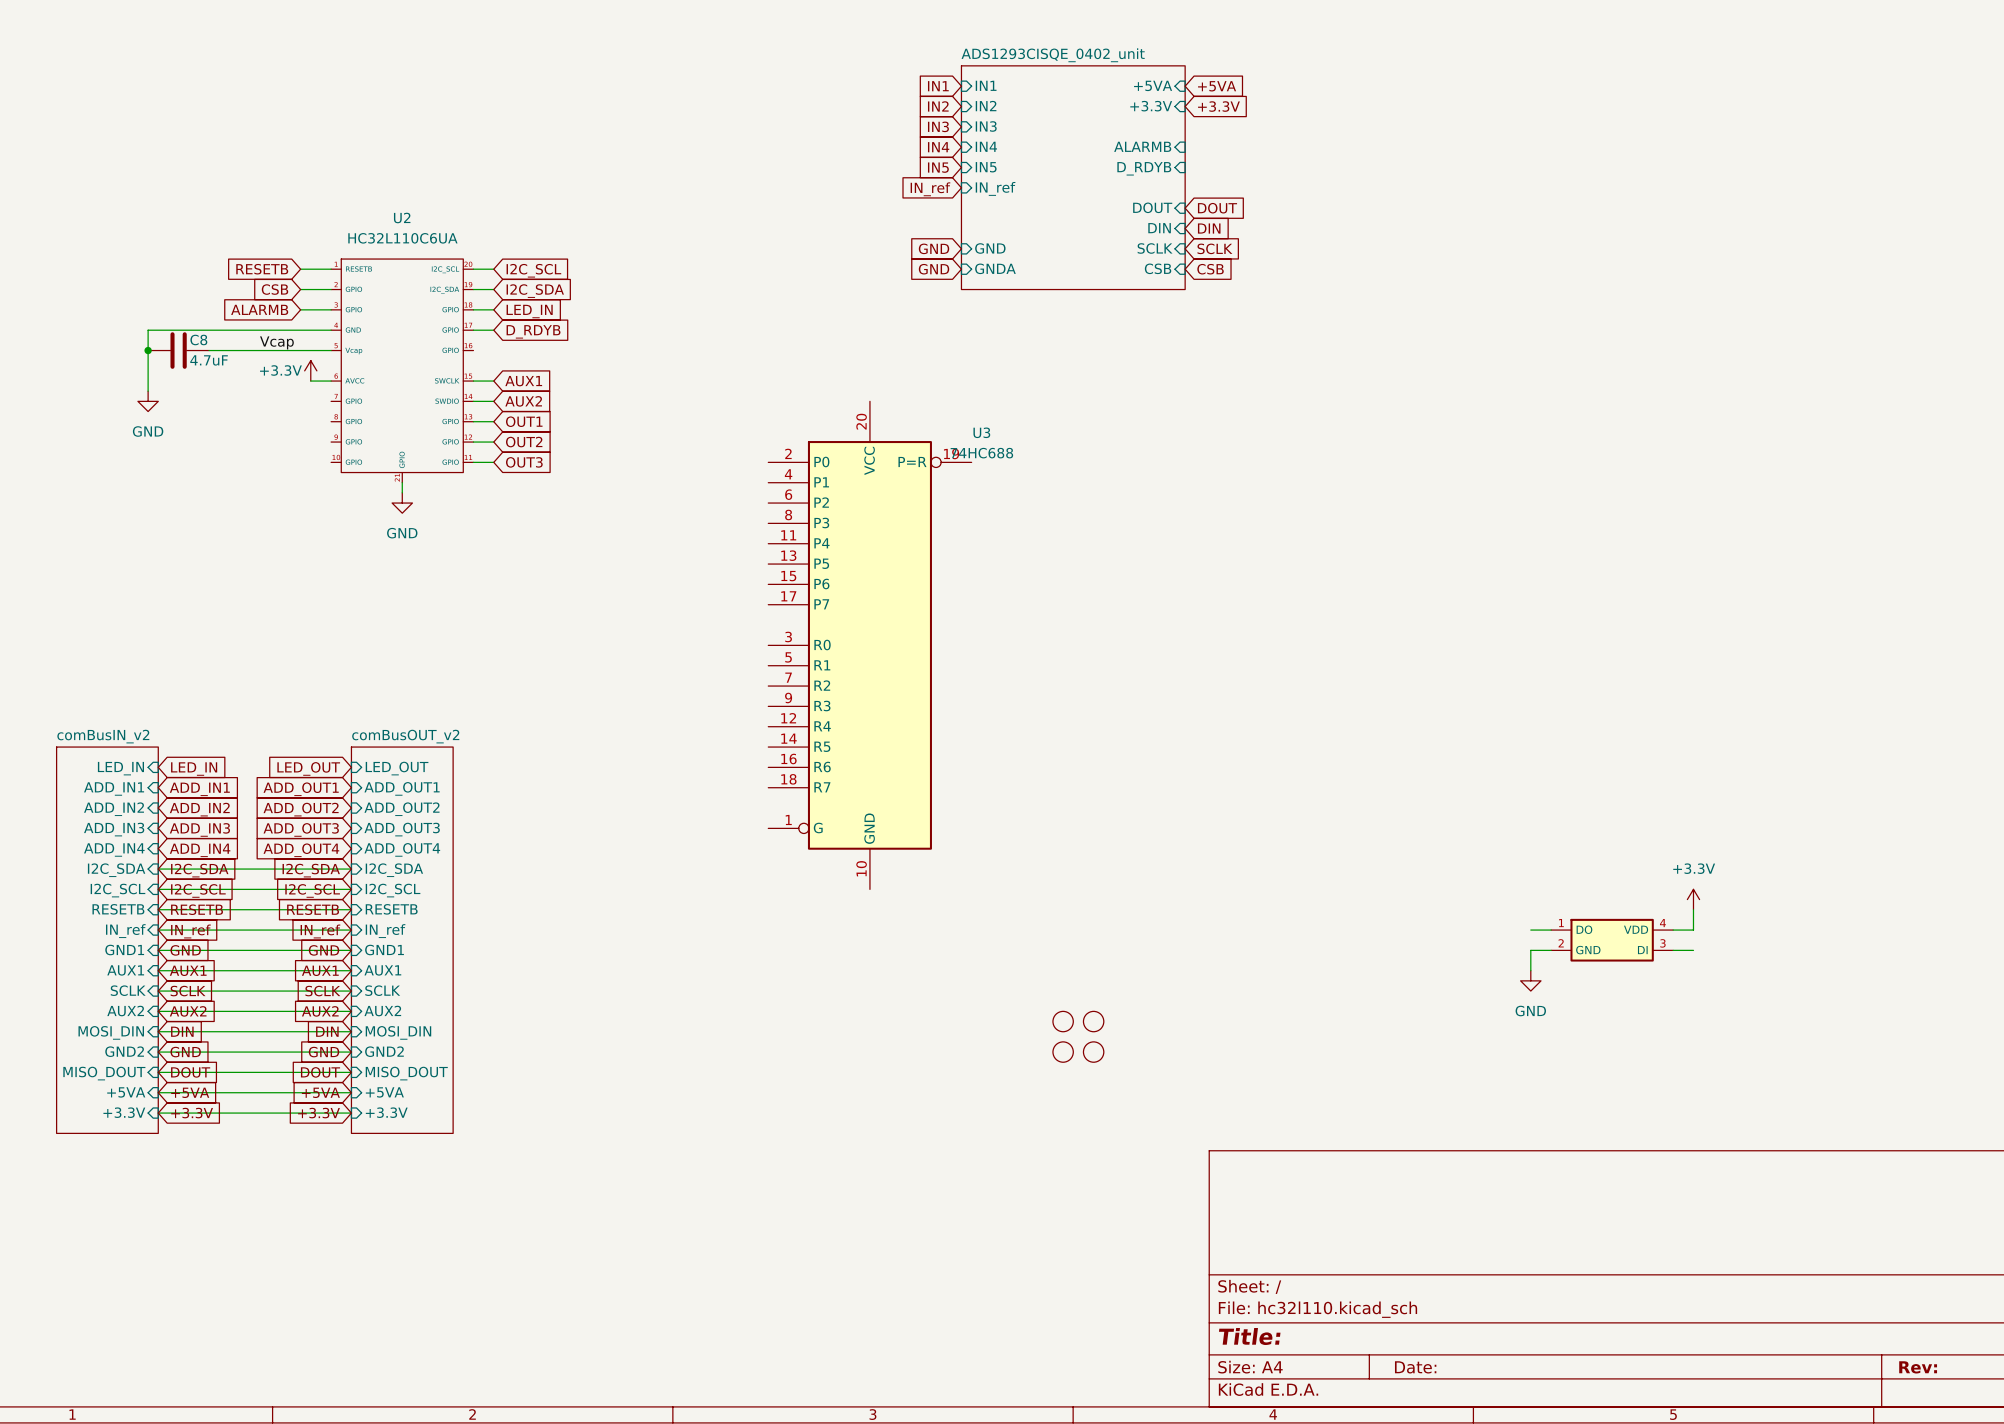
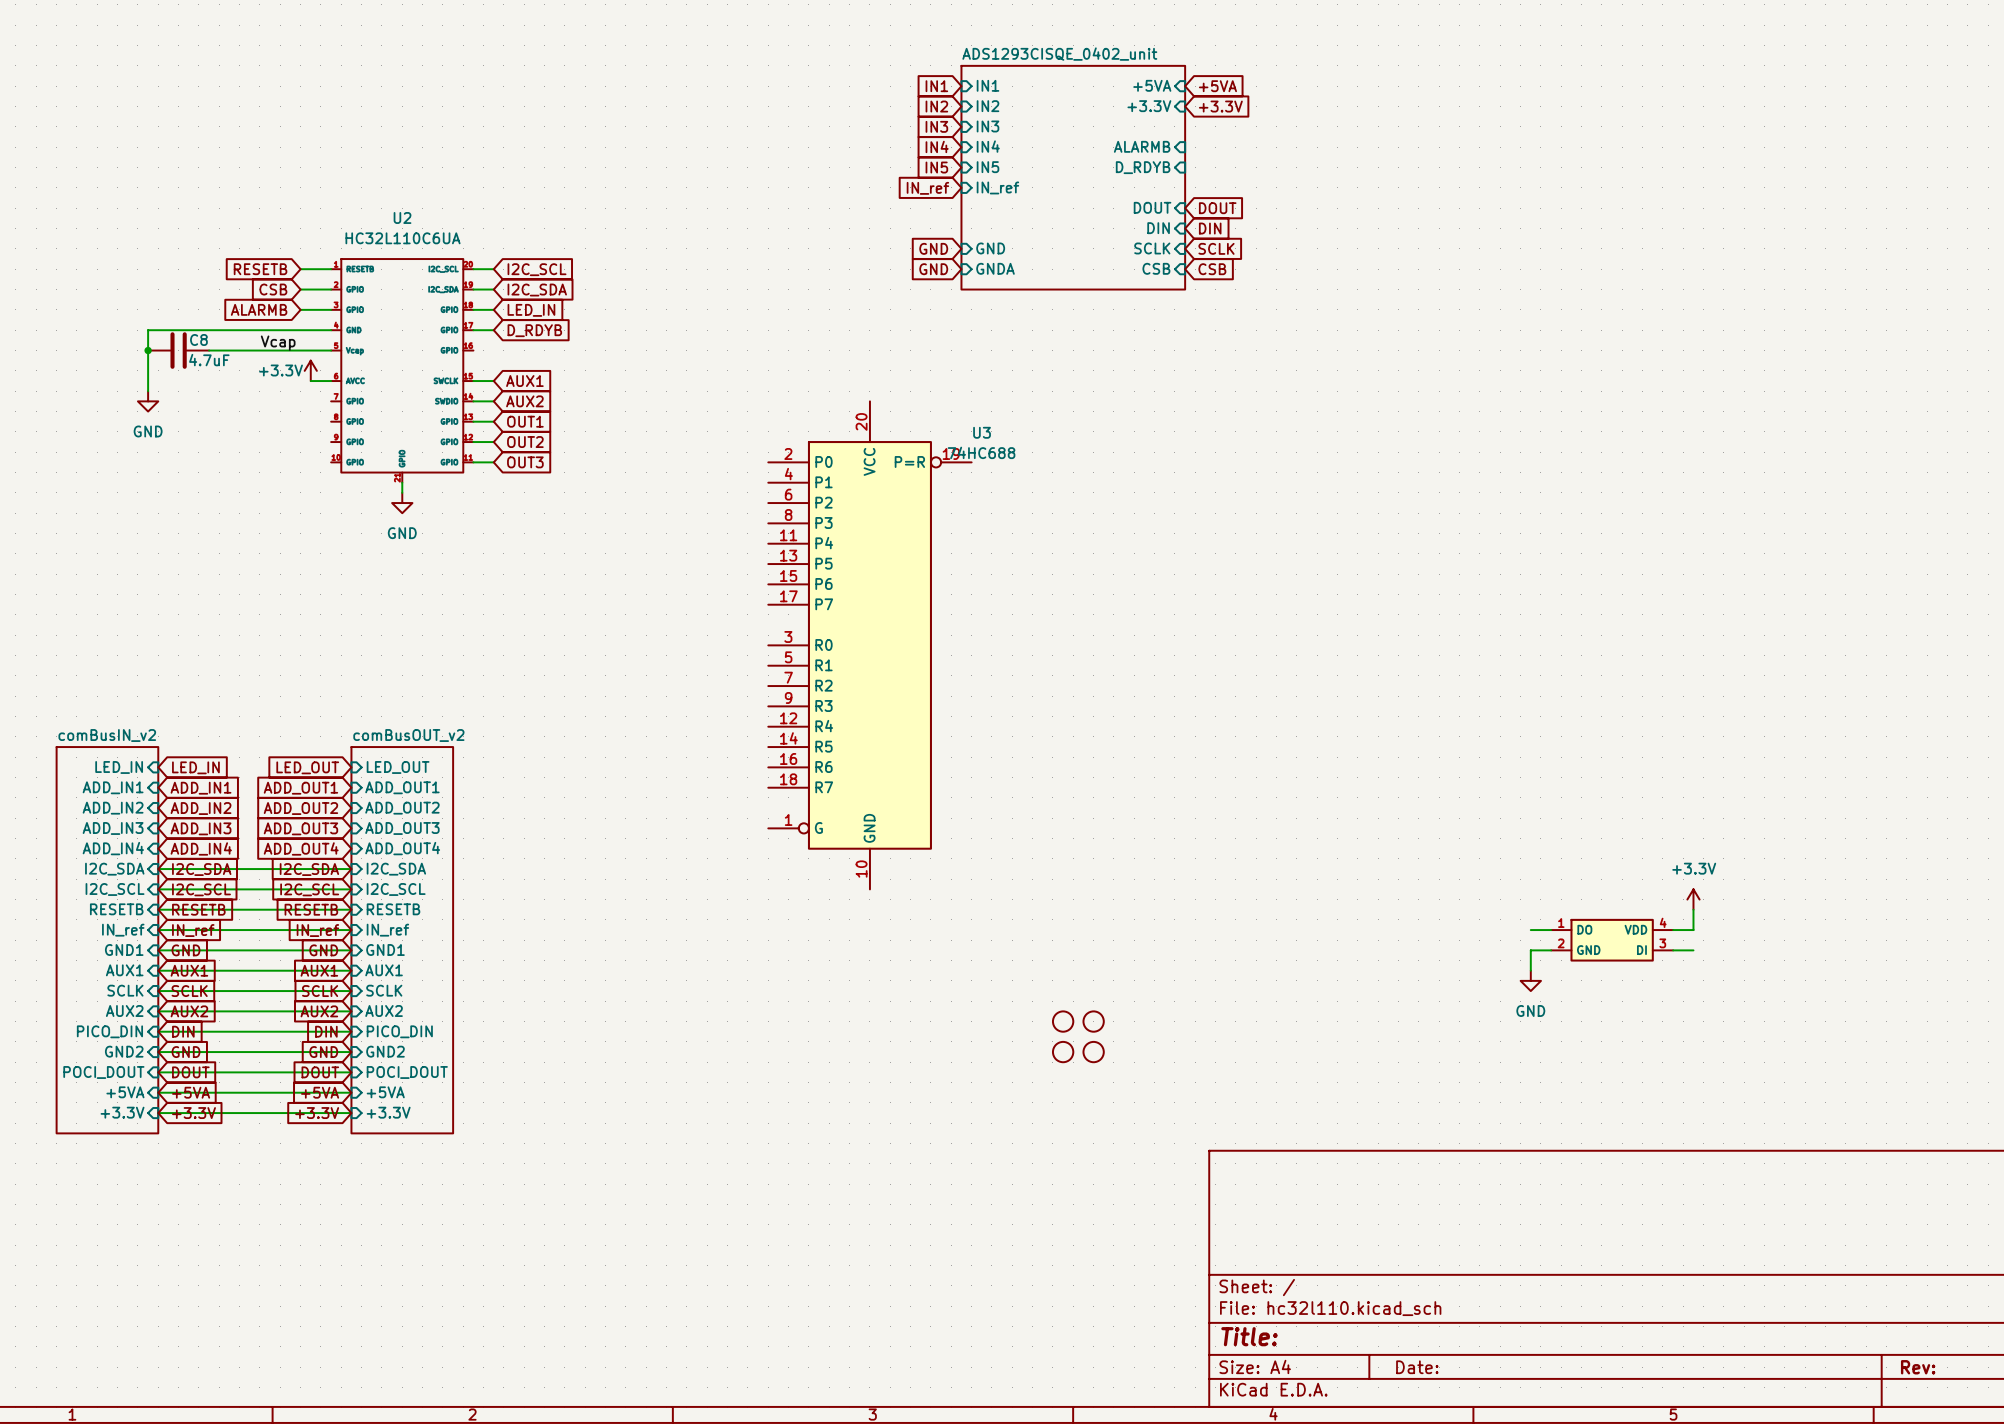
sheet pin: MOSI_DIN (111, 1032) -> PICO_DIN (109, 1031)
sheet pin: MOSI_DIN (398, 1032) -> PICO_DIN (399, 1031)
sheet pin: MISO_DOUT (104, 1073) -> POCI_DOUT (103, 1072)
sheet pin: MISO_DOUT (406, 1073) -> POCI_DOUT (407, 1072)

